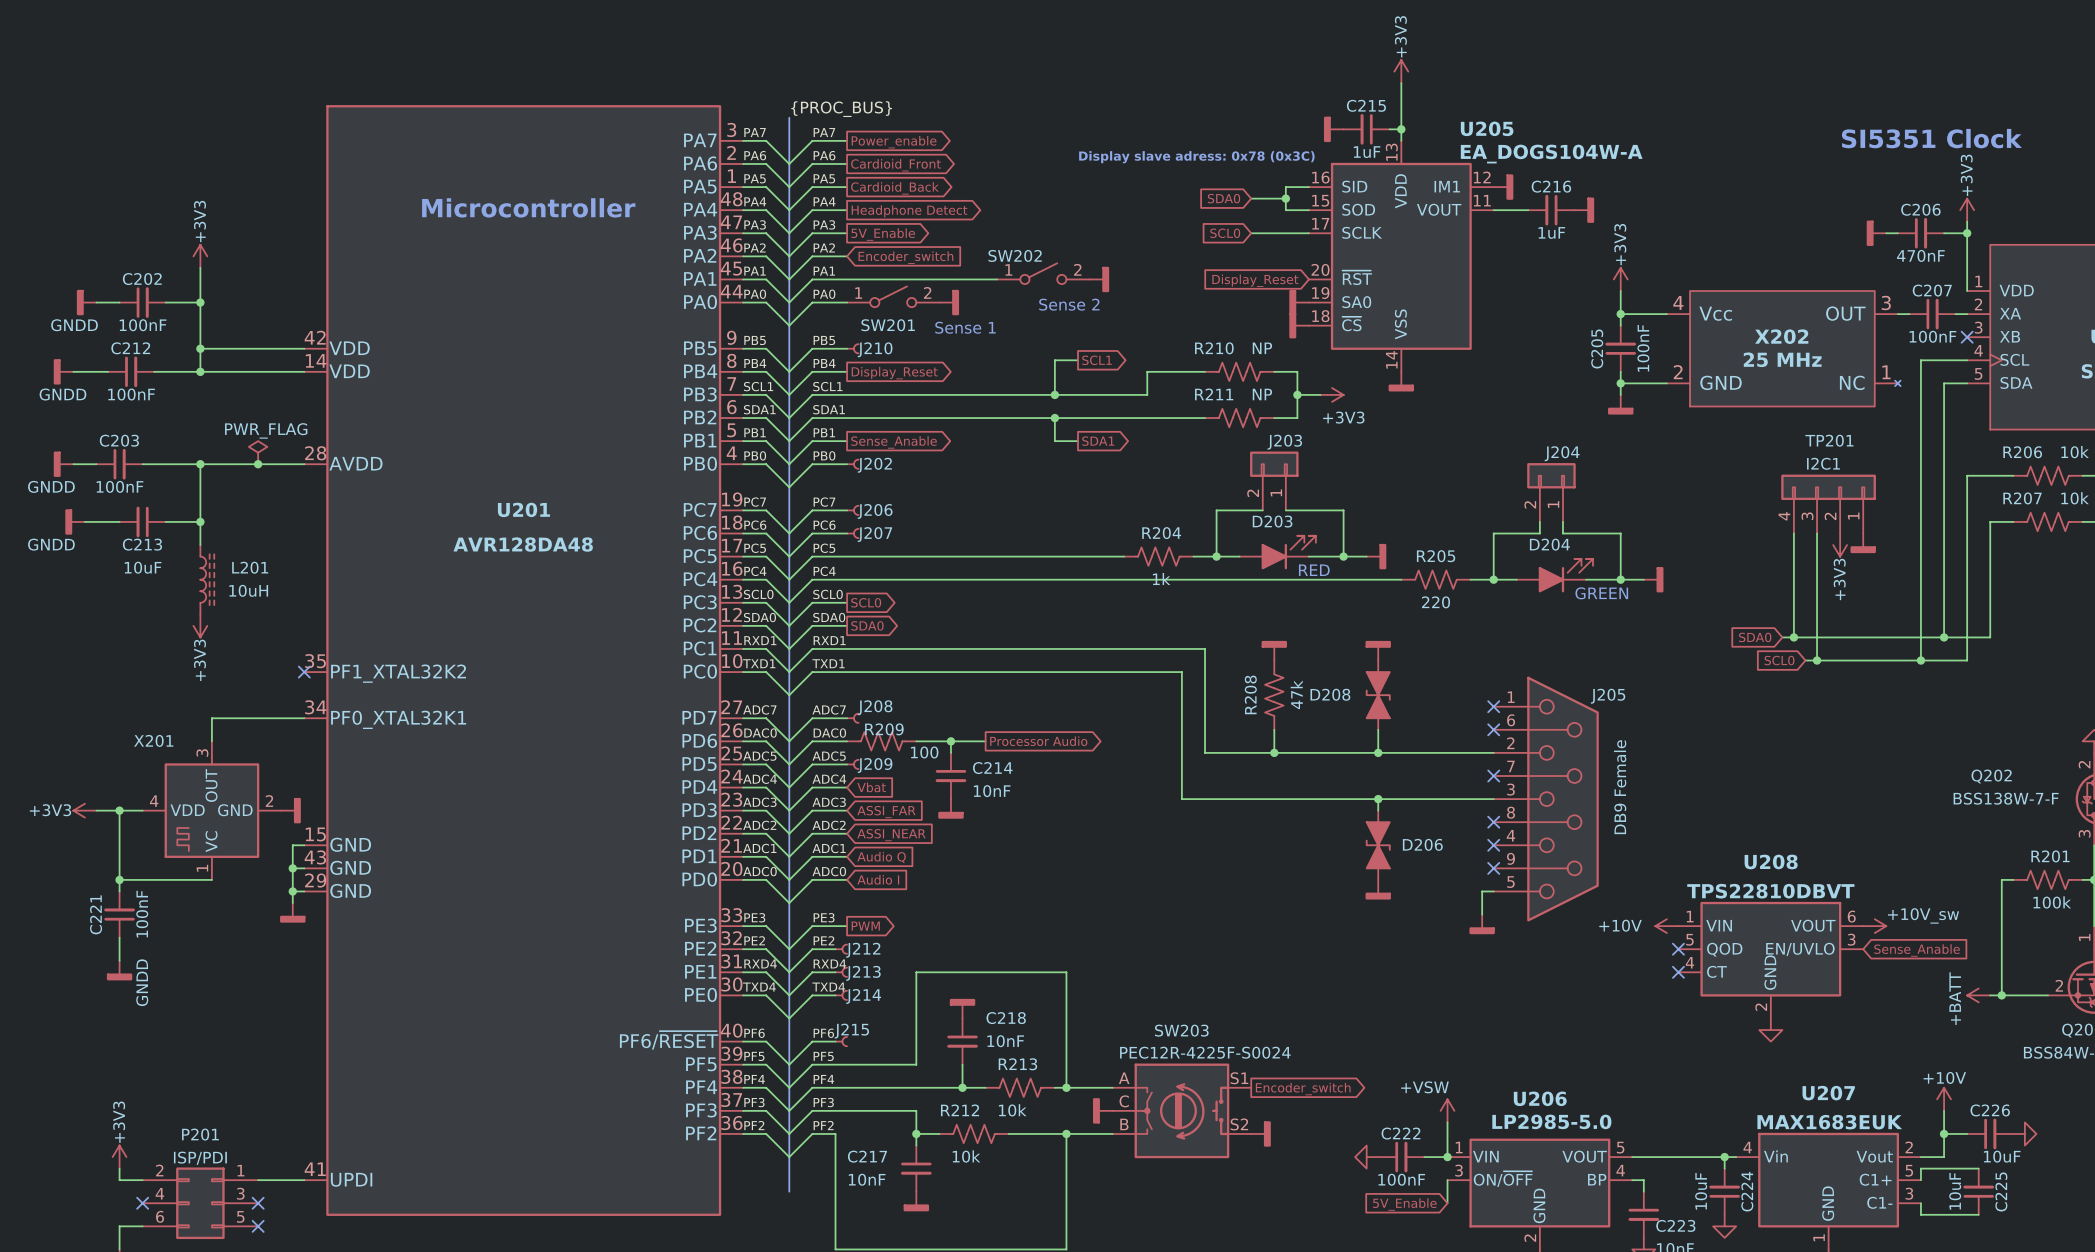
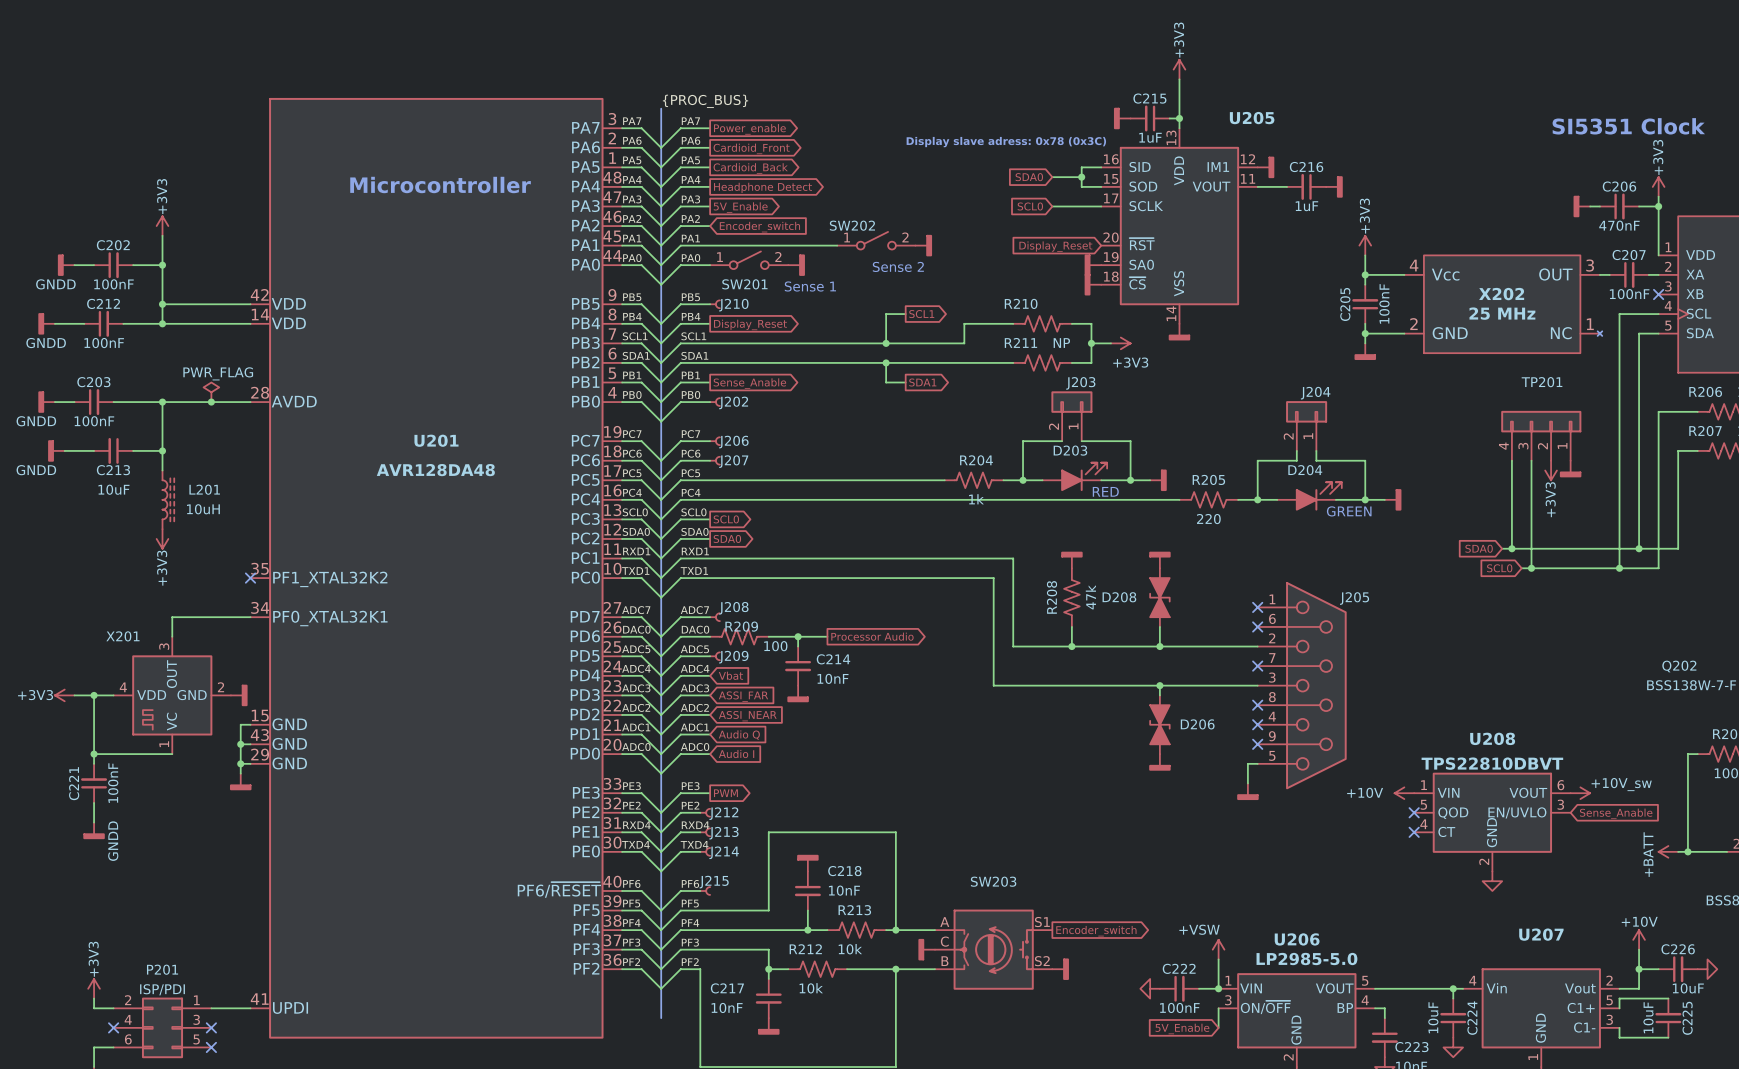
U205 value: EA_DOGS104W-A (1551, 154) -> none
R210 value: NP (1262, 348) -> none
TP201 value: I2C1 (1823, 463) -> none
J205 value: DB9 Female (1620, 787) -> none
SW203 value: PEC12R-4225F-S0024 (1205, 1052) -> none
U207 value: MAX1683EUK (1829, 1122) -> none

